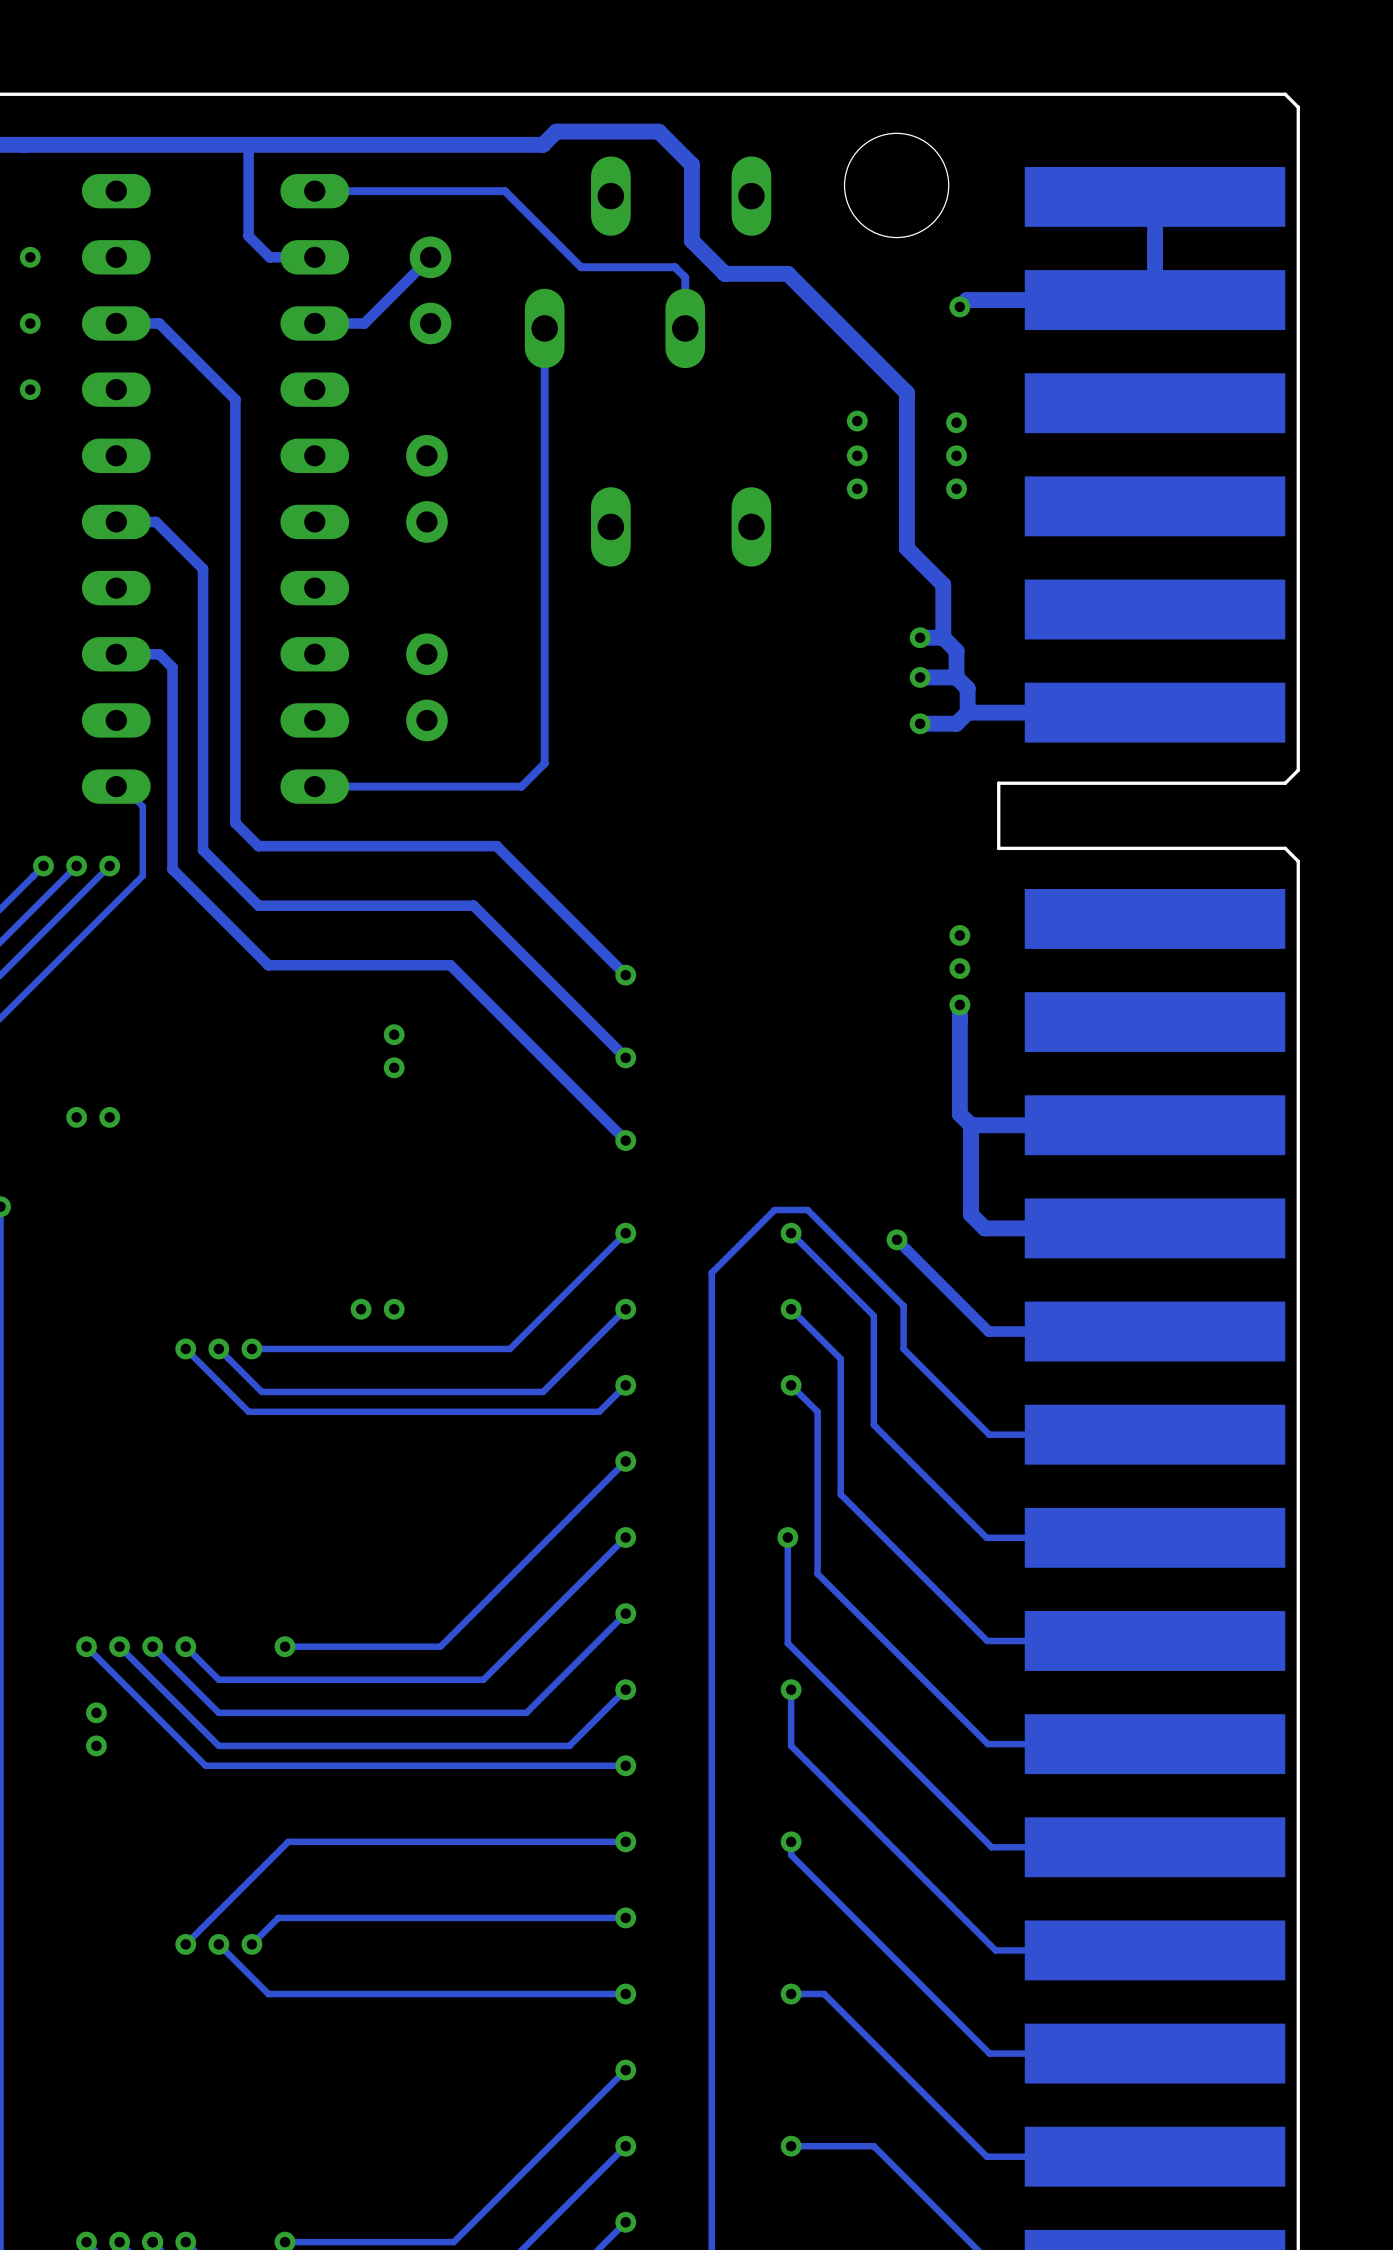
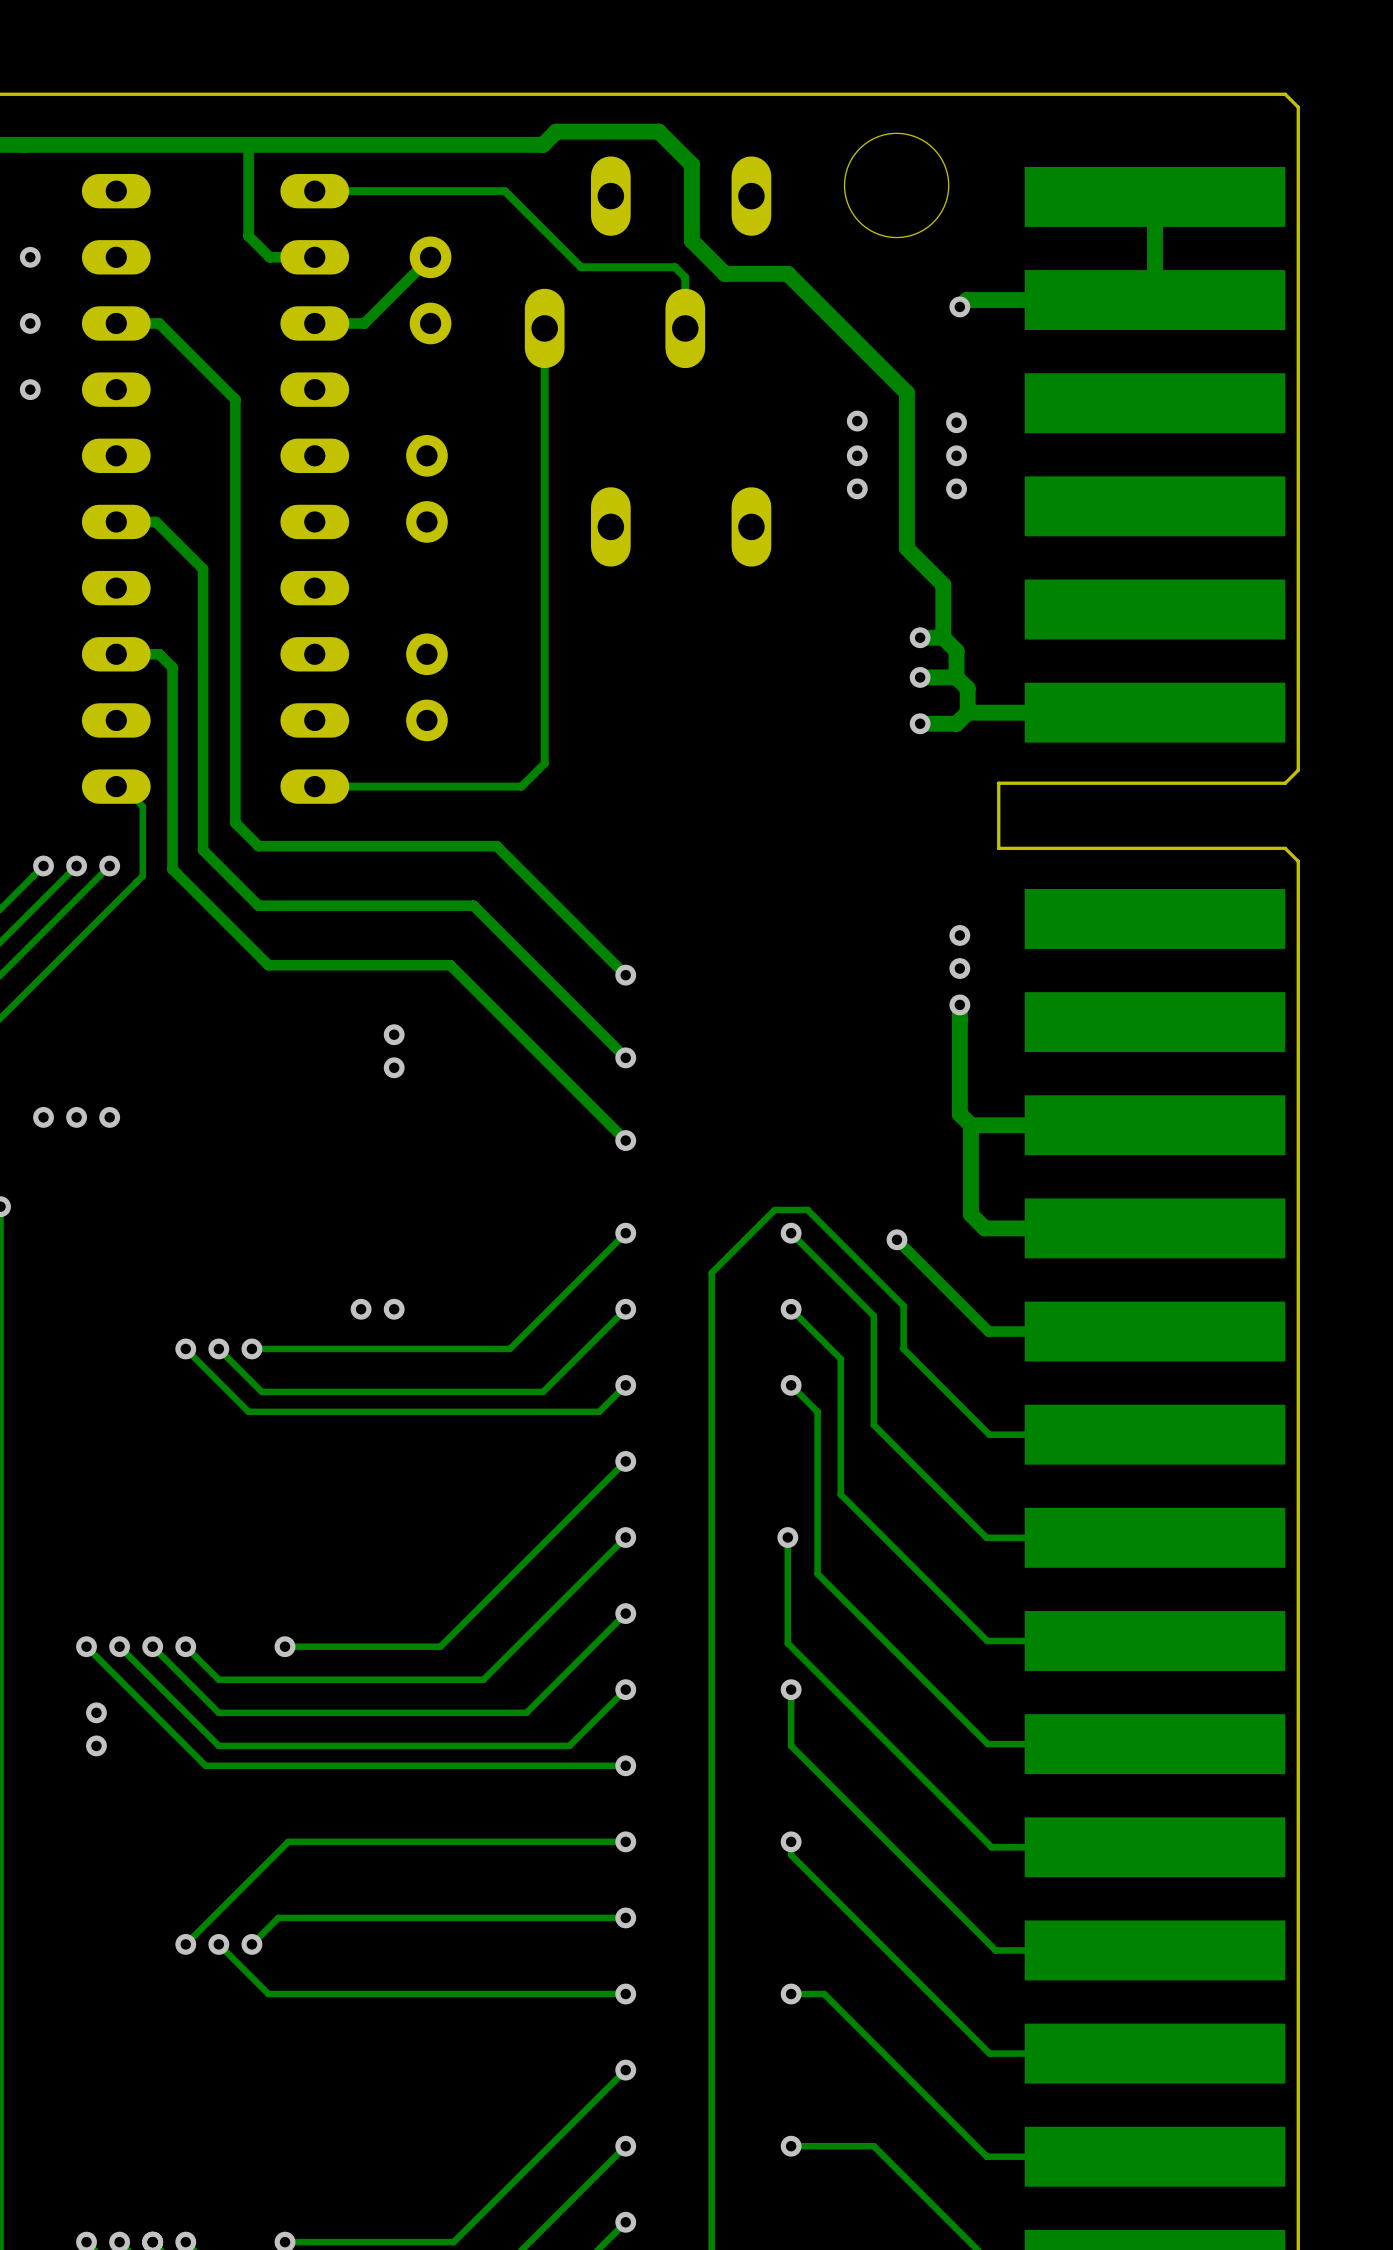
via: none -> (43, 1117)

